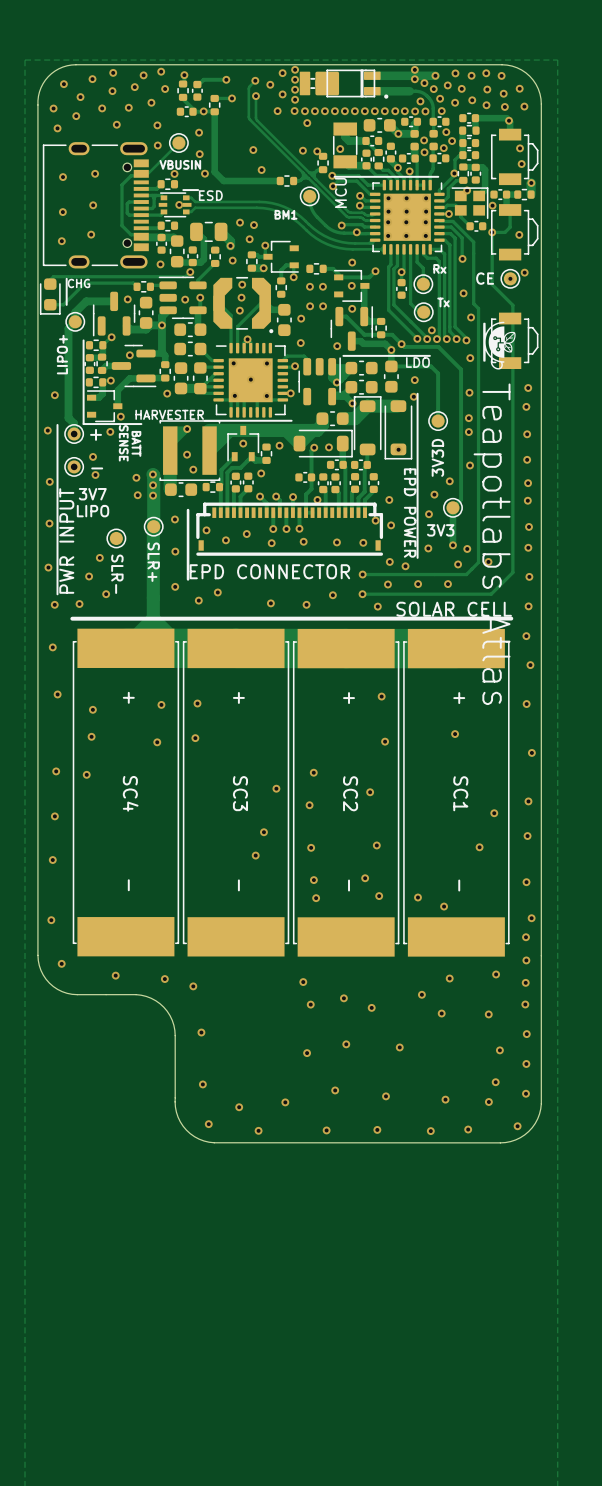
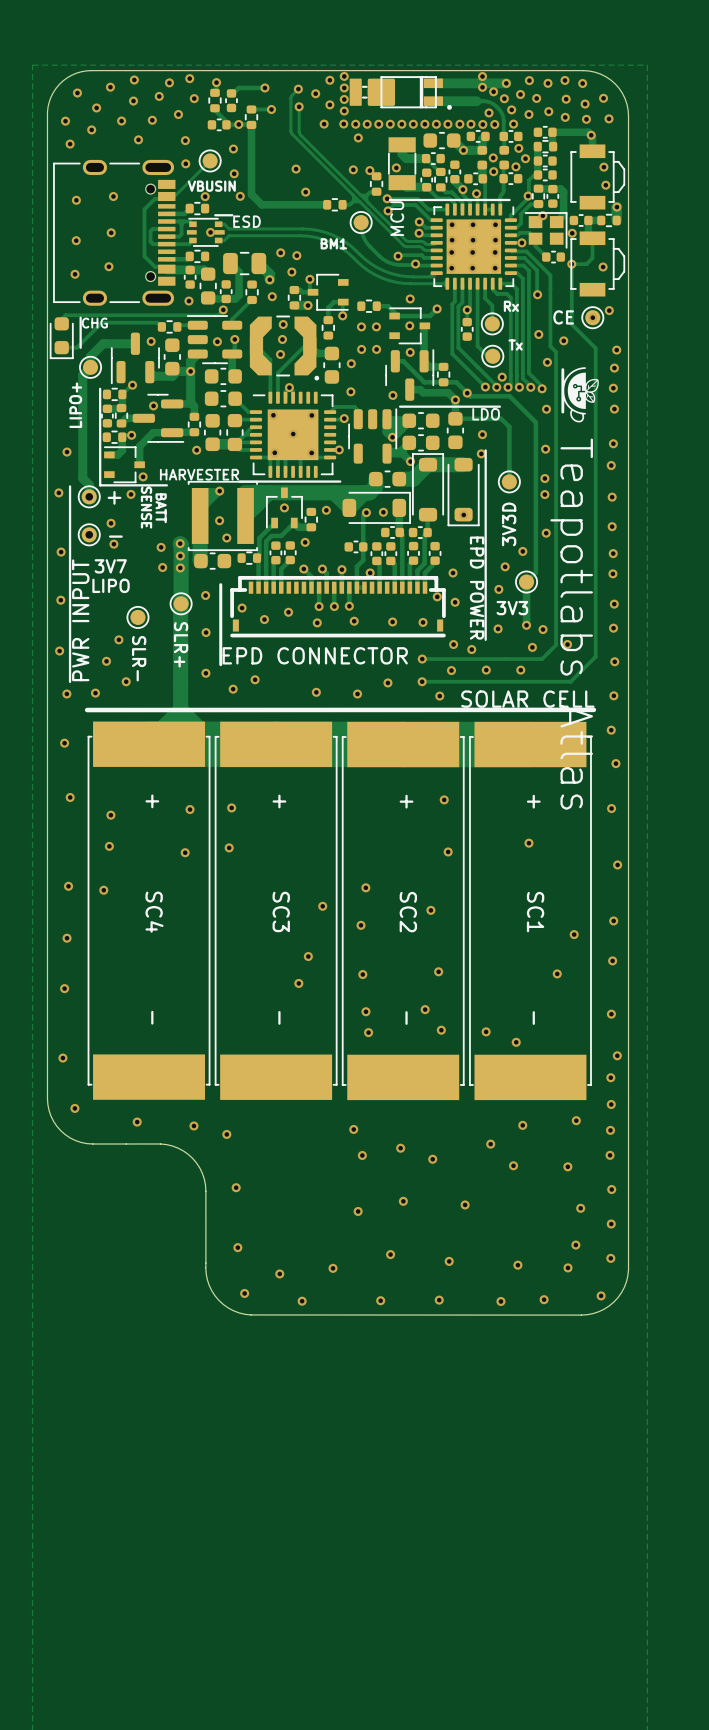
via: none -> (563, 340)
via: none -> (616, 350)
via: none -> (614, 368)
via: none -> (613, 388)
part: (514, 340) -> none
via: none -> (614, 409)

